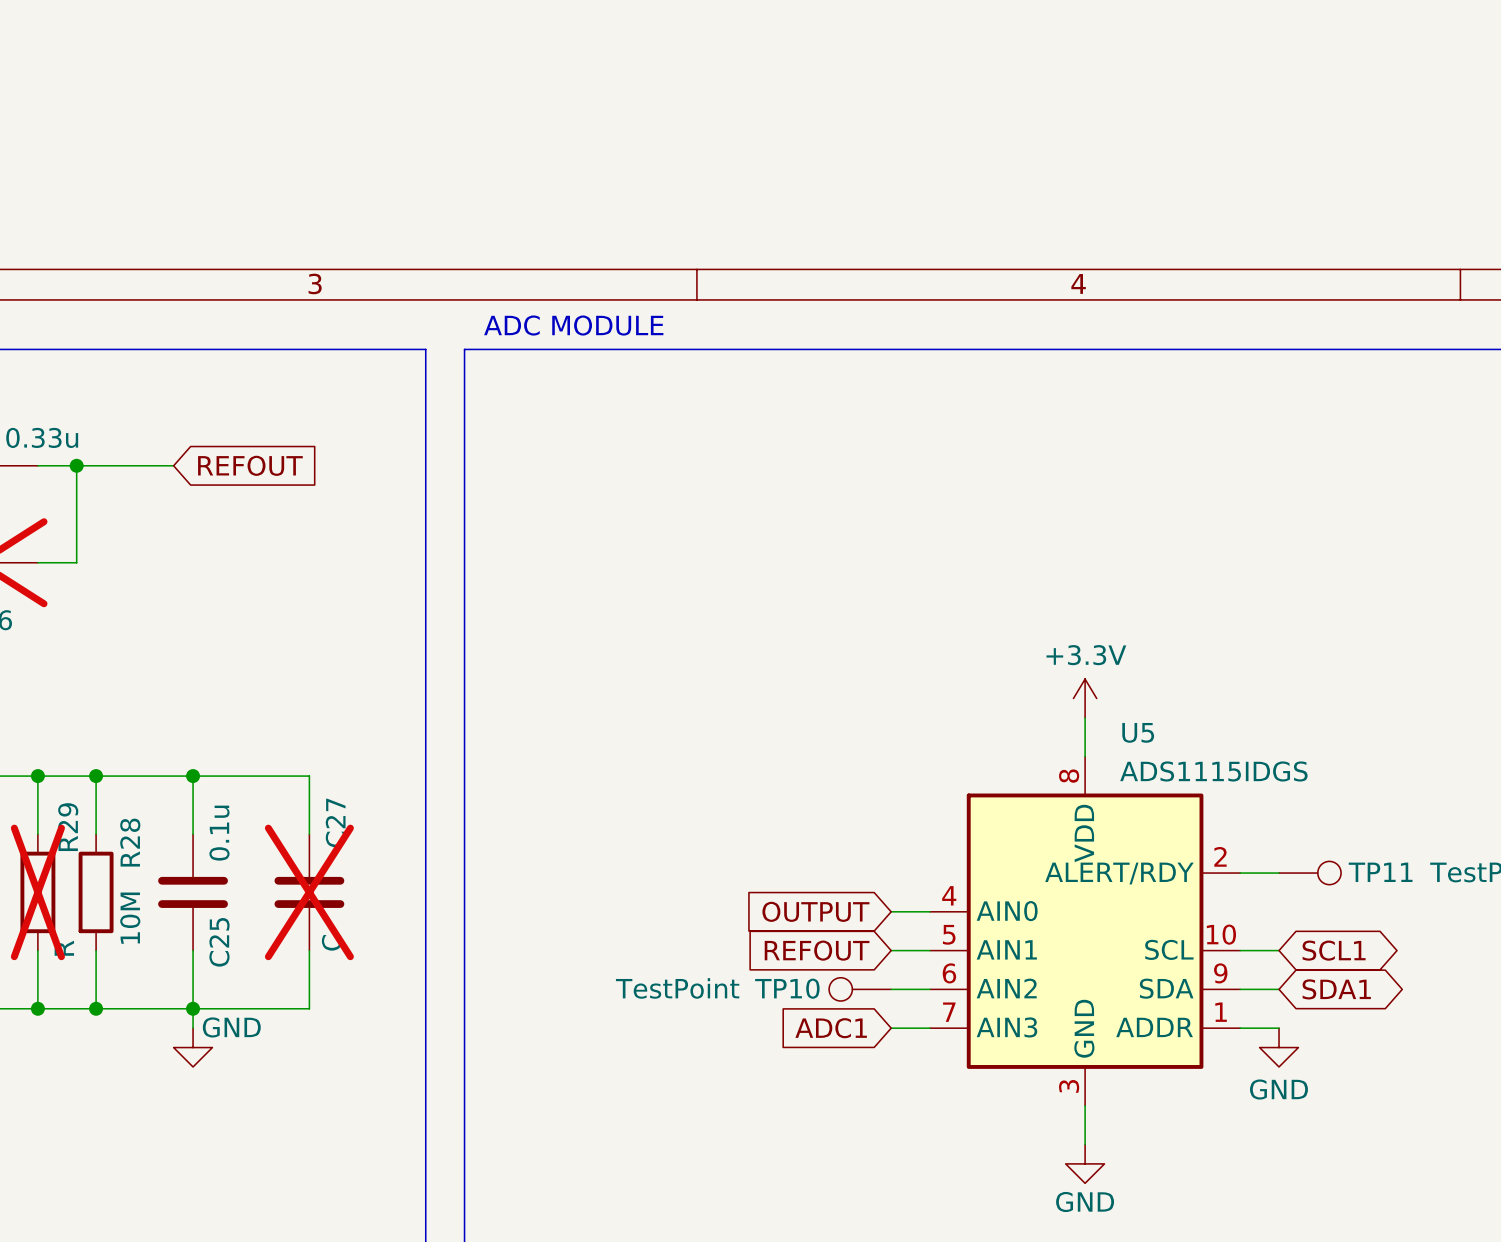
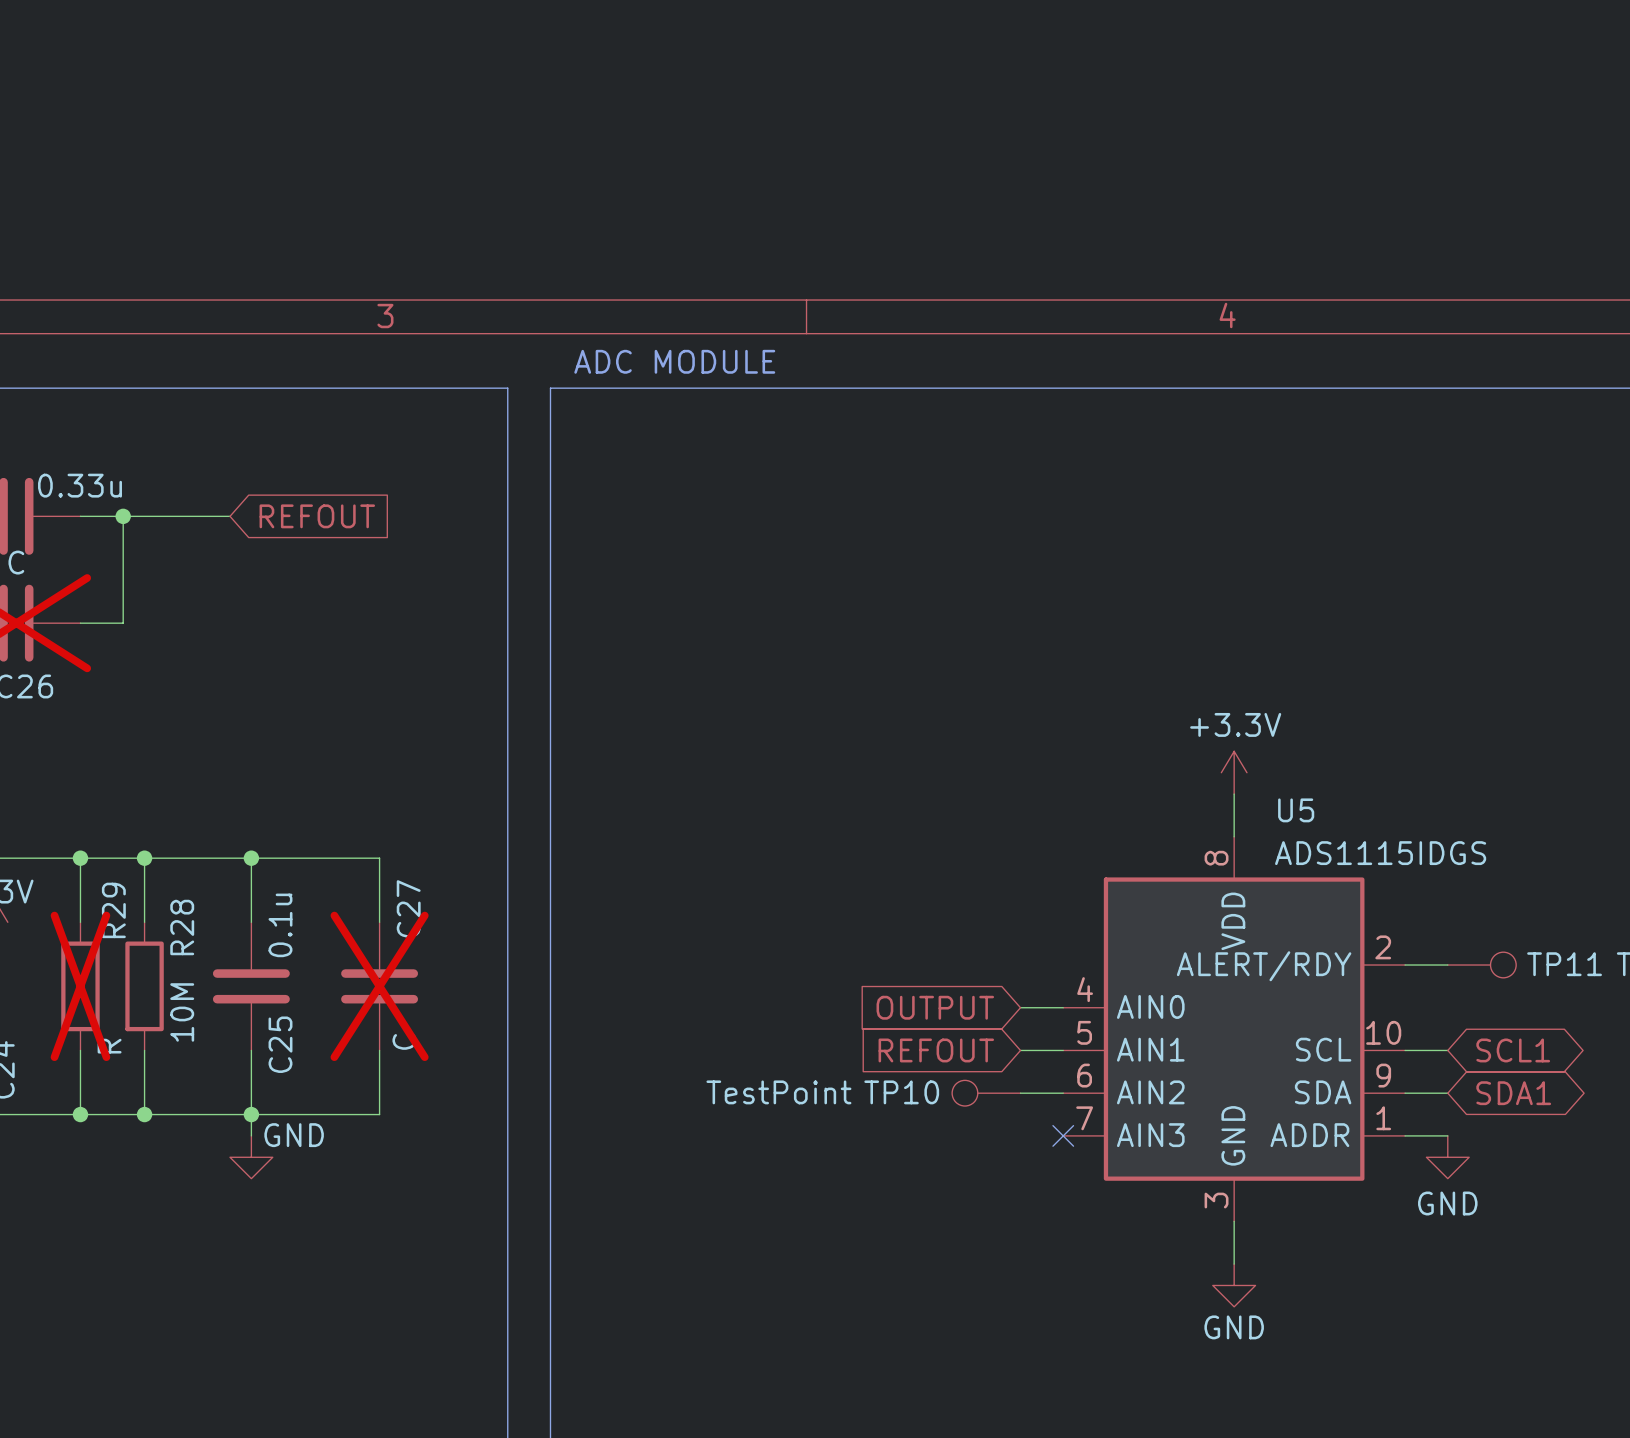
global label: ADC1 (831, 1028) -> none
wire: (891, 1028) (929, 1028) -> none
no-connect mark: none -> (1063, 1135)

